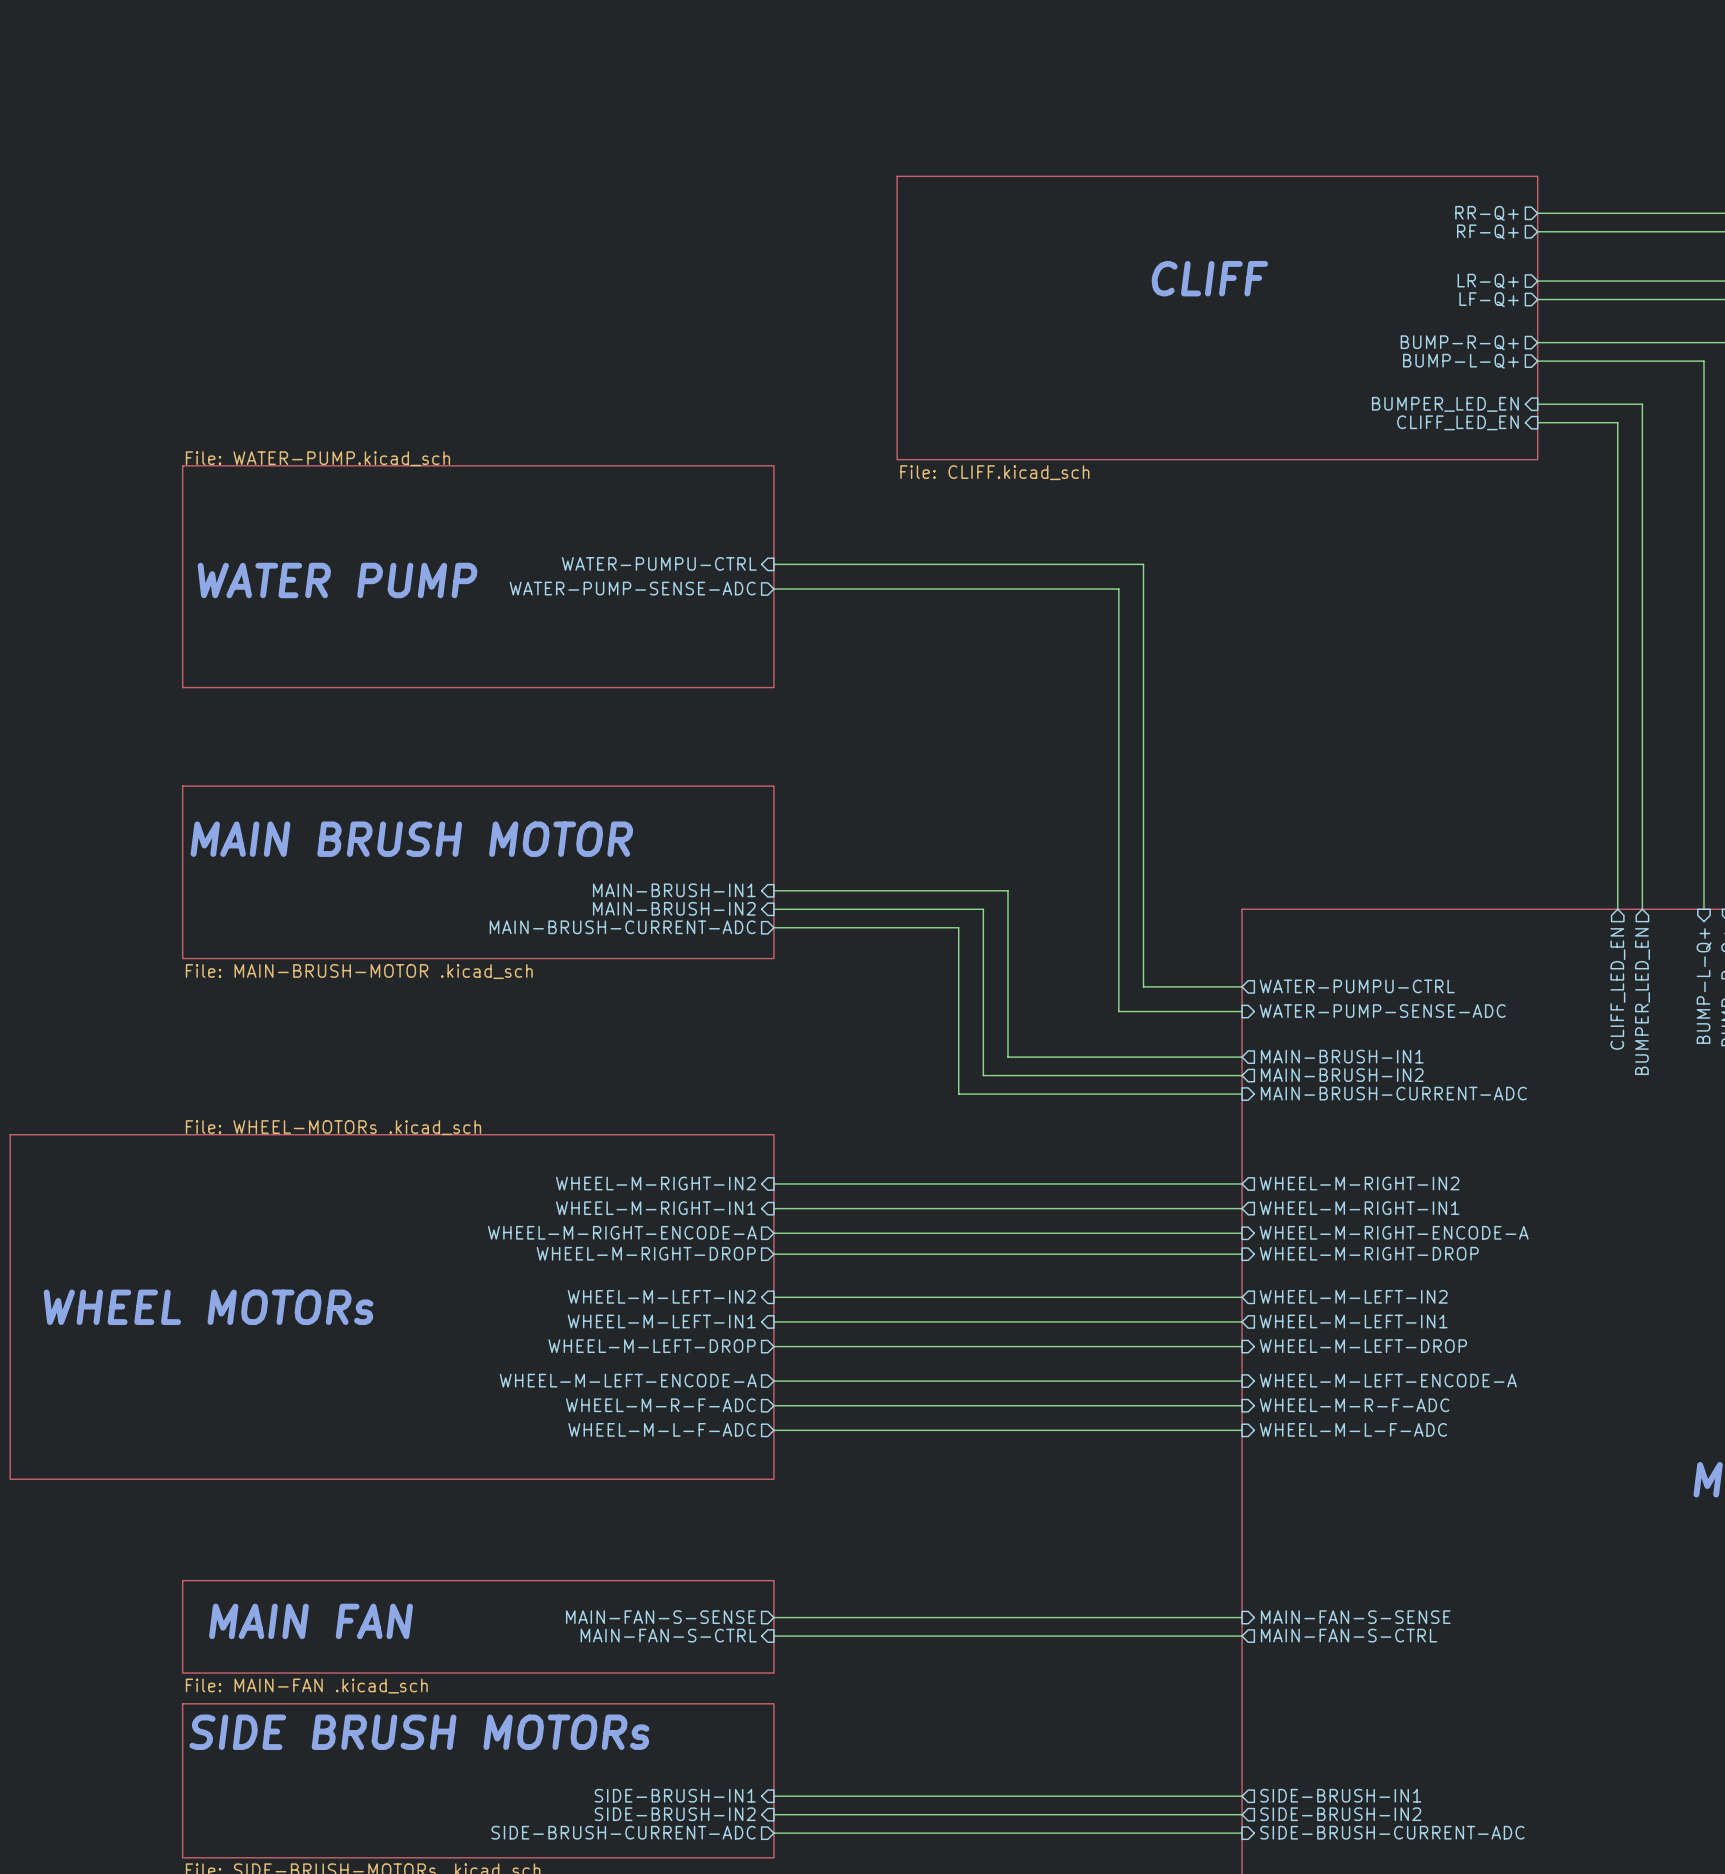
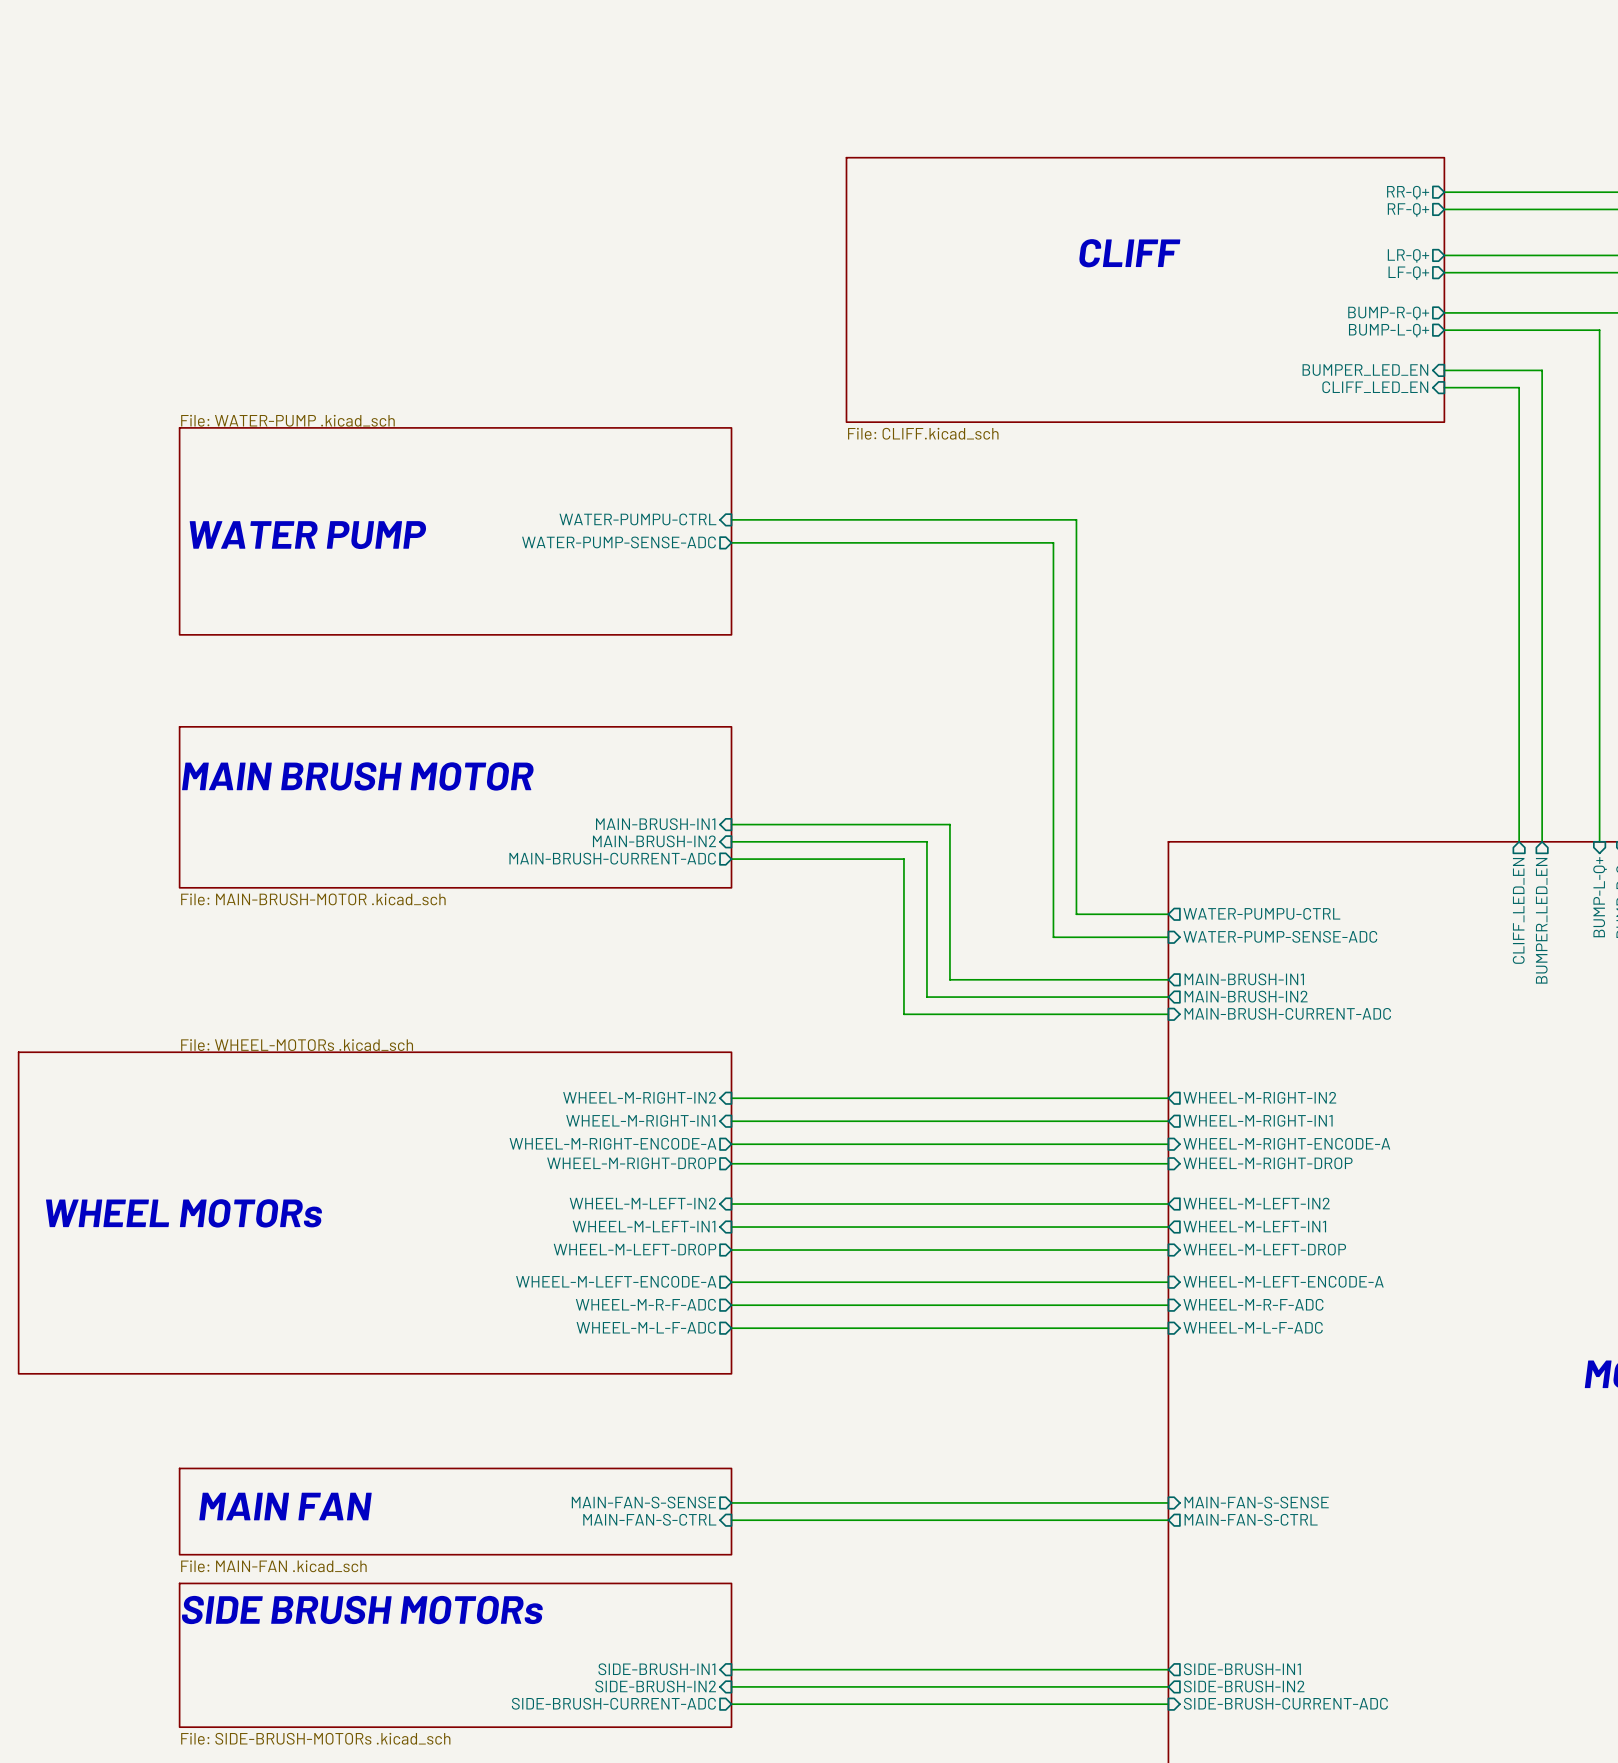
sheet value: File: WATER-PUMP.kicad_sch (317, 458) -> File: WATER-PUMP .kicad_sch (287, 420)

